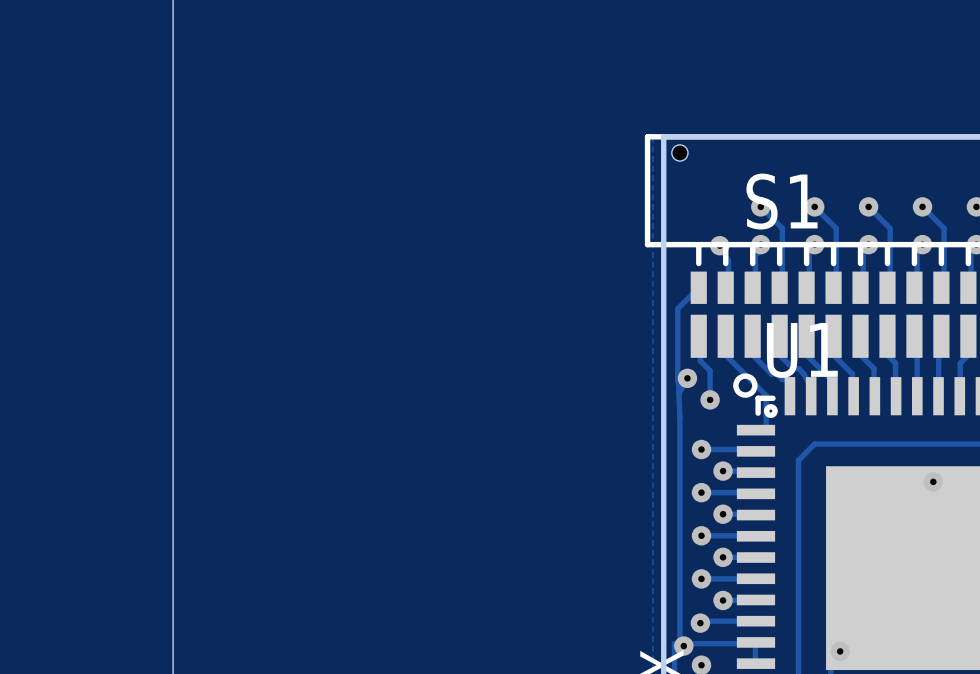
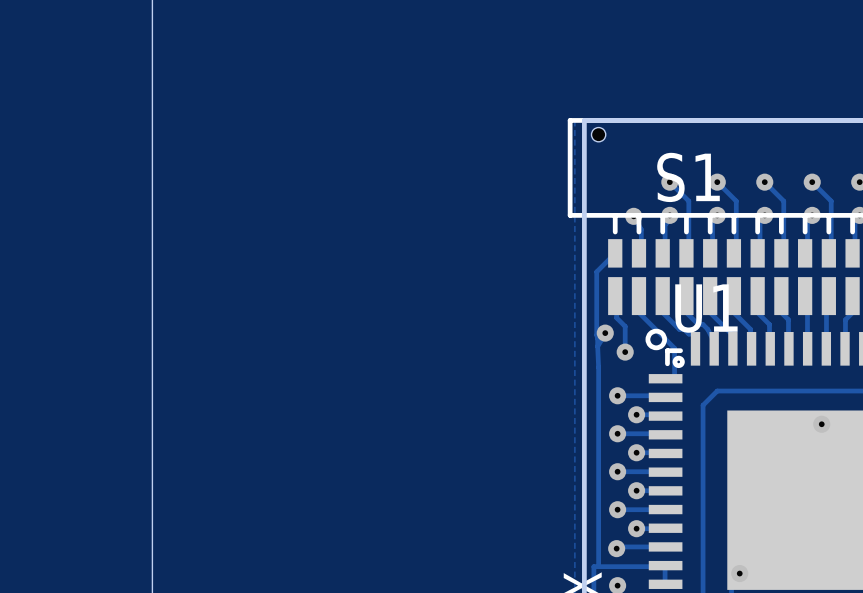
via: (683, 646) -> none

